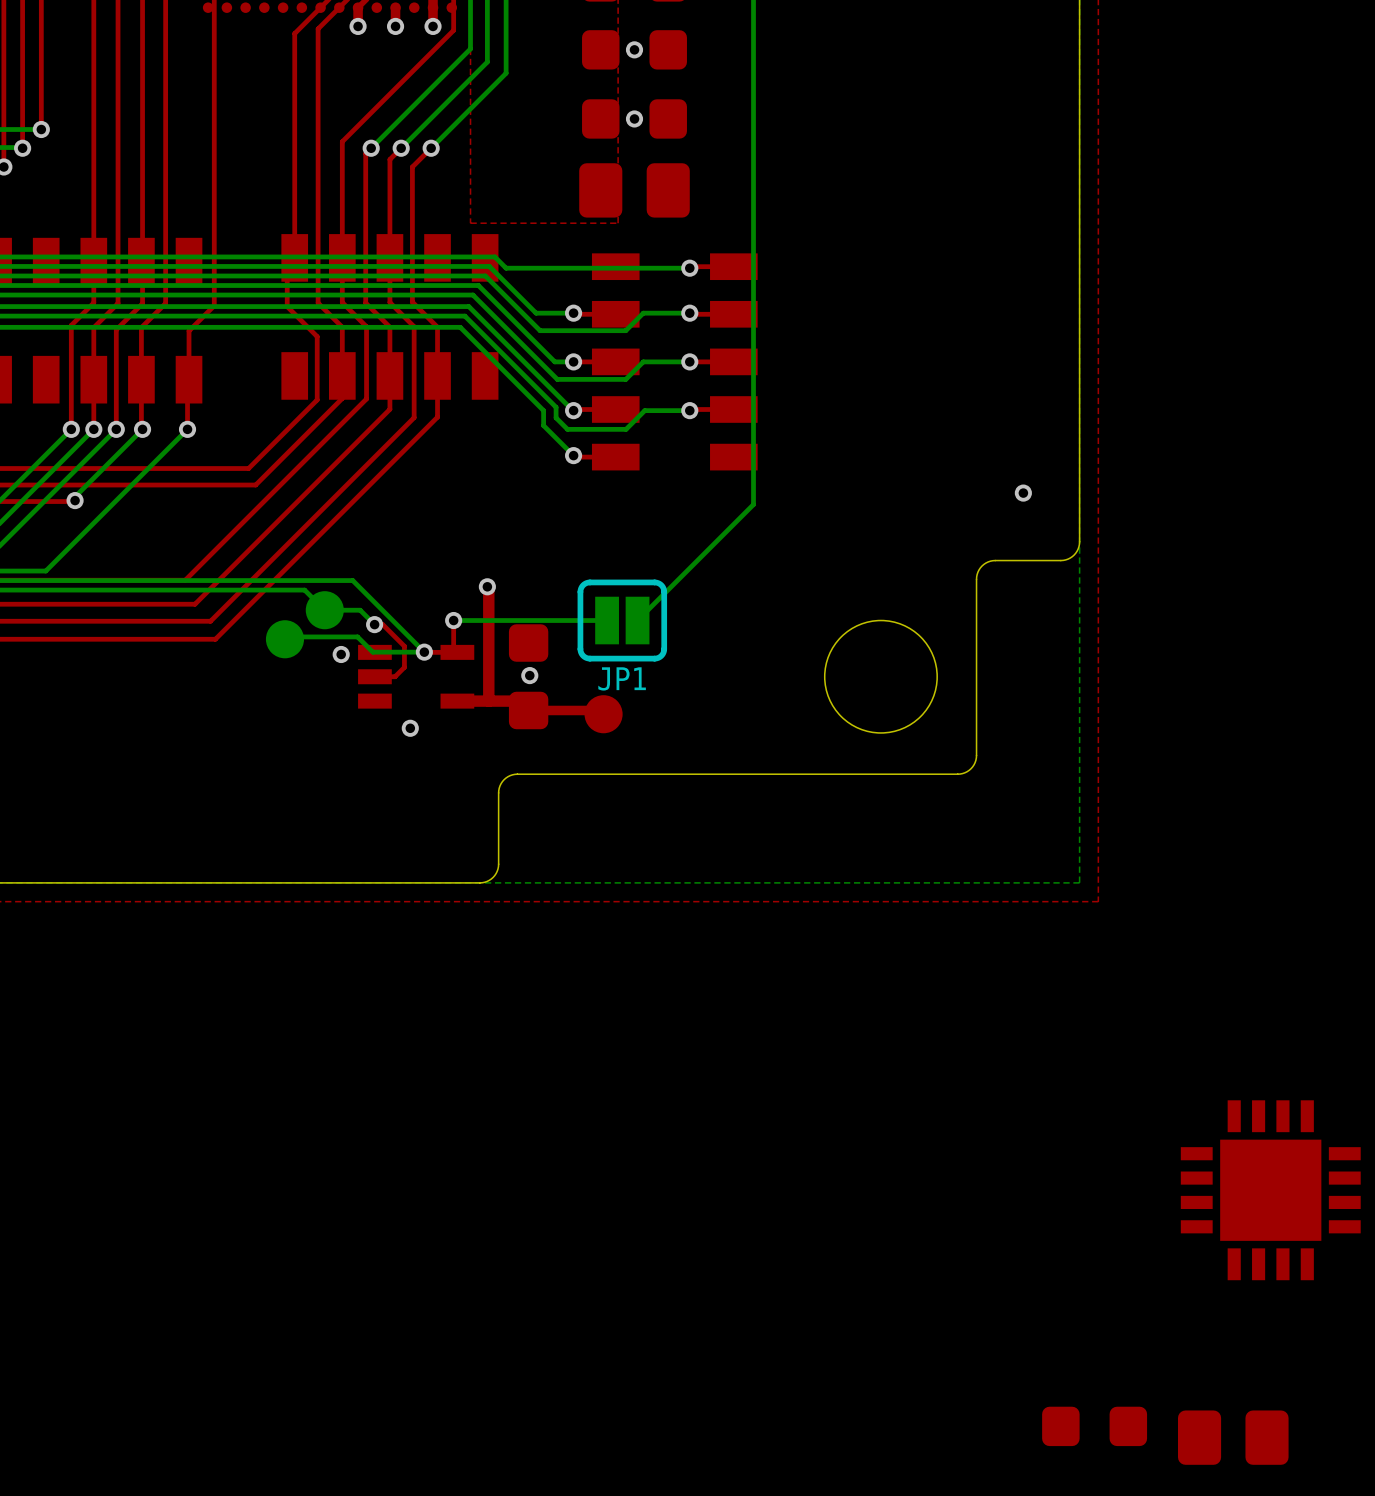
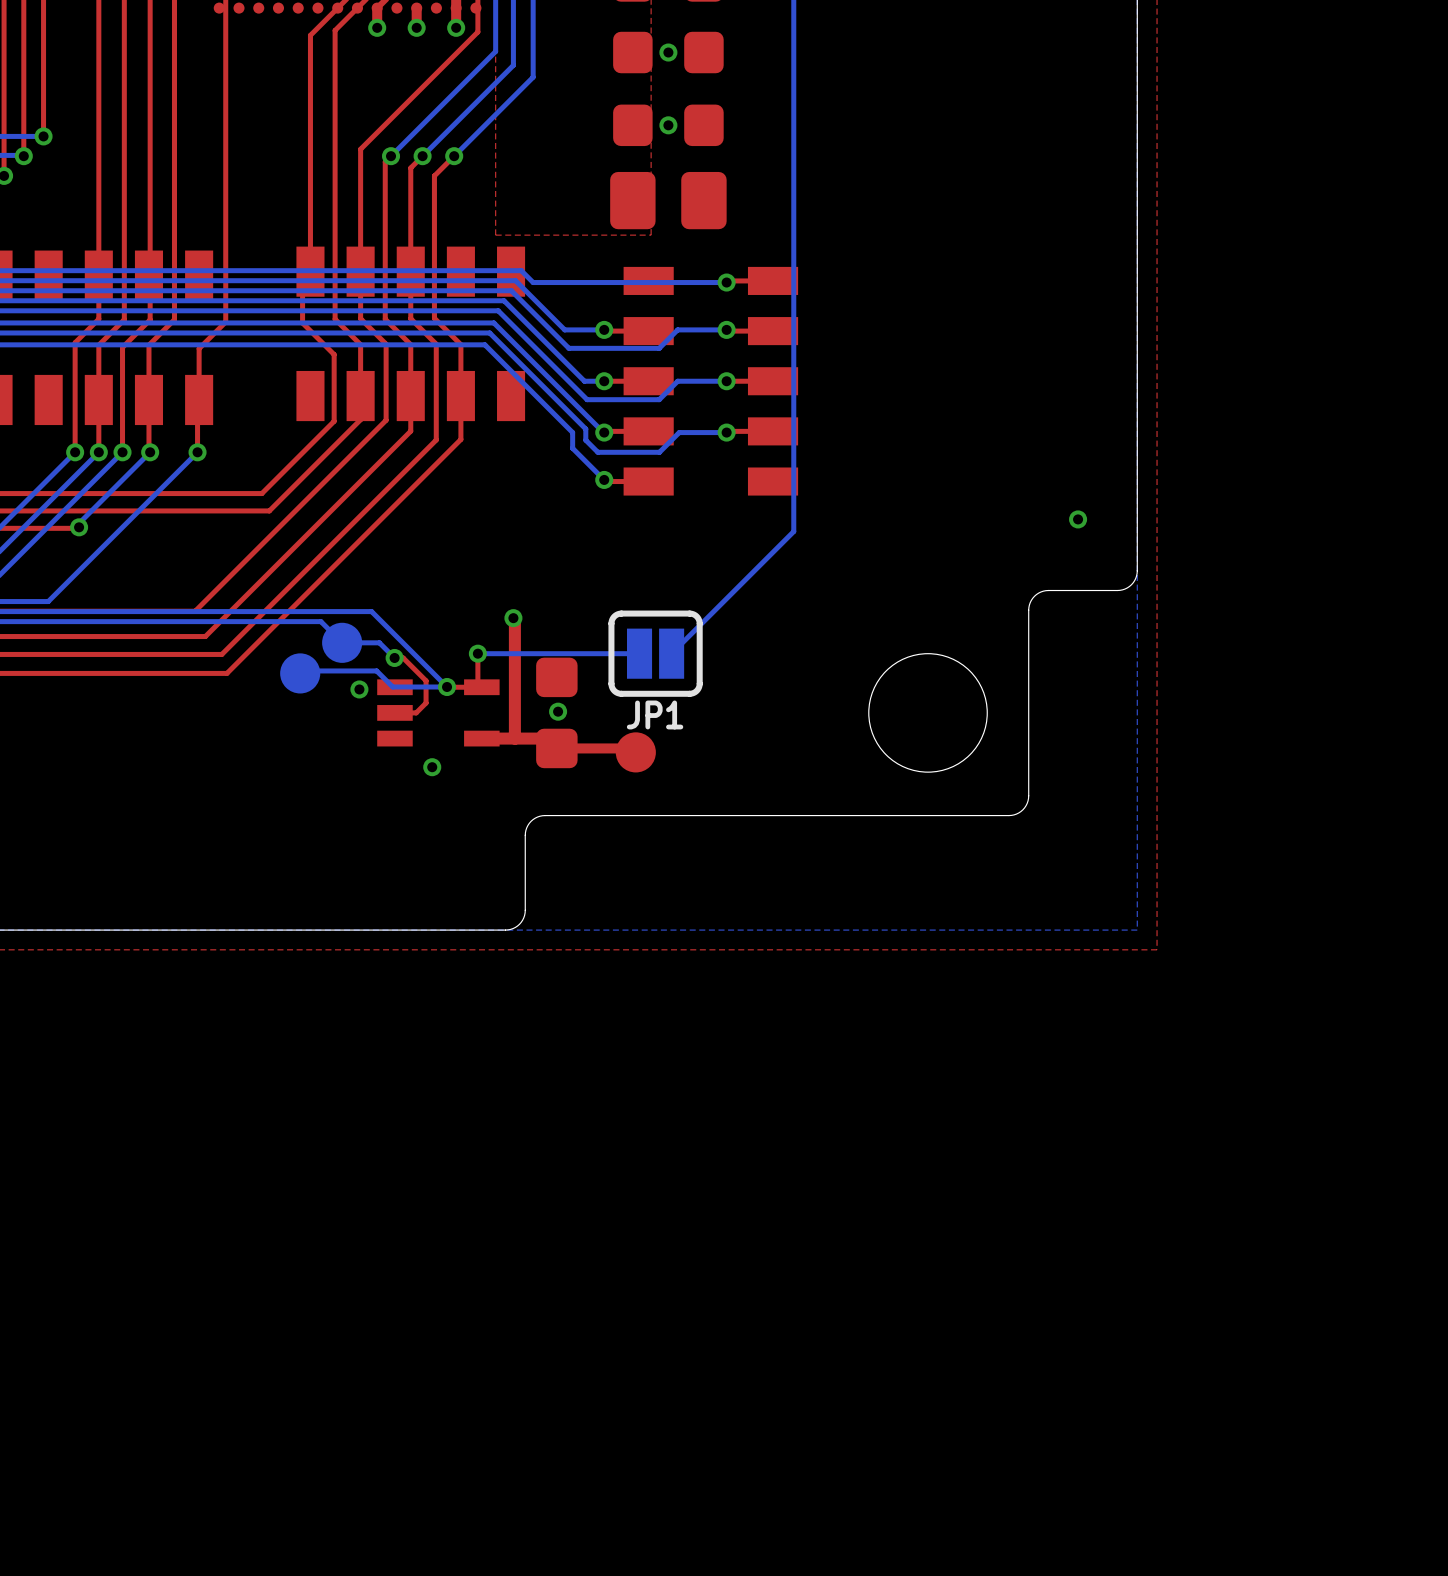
part: (1270, 1190) -> none
part: (1094, 1426) -> none
part: (1233, 1437) -> none

